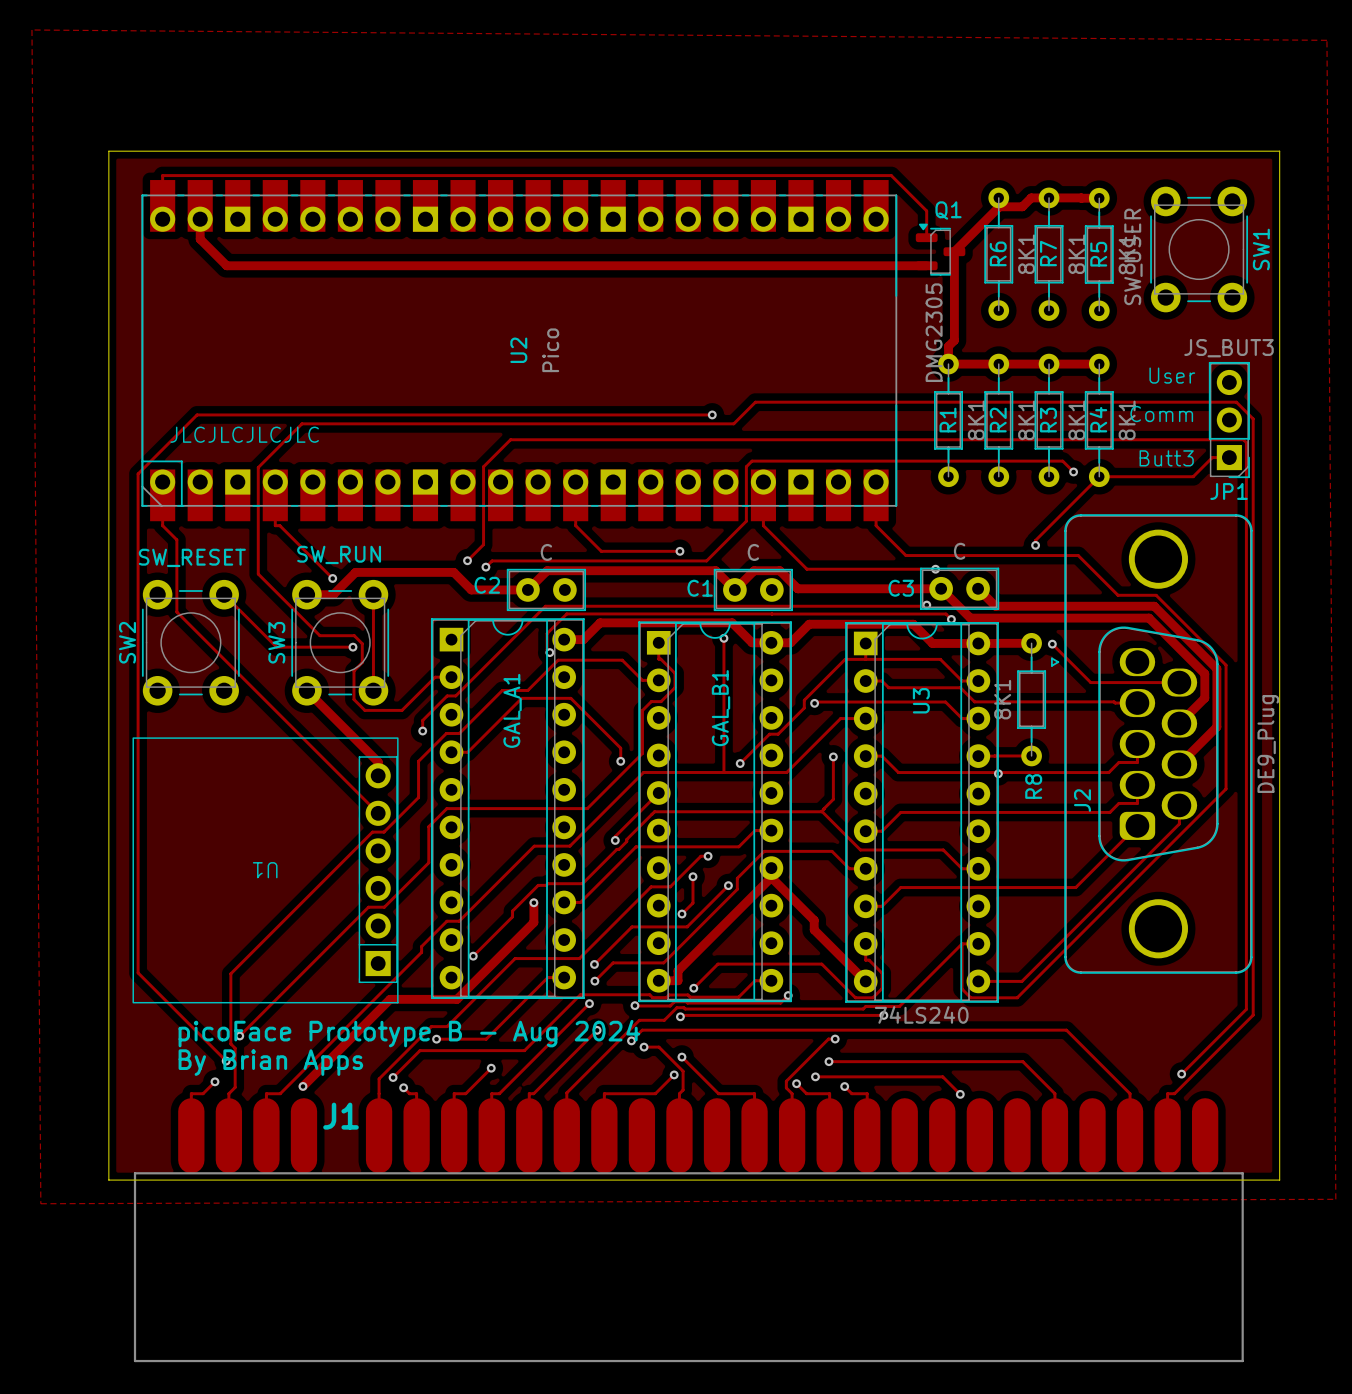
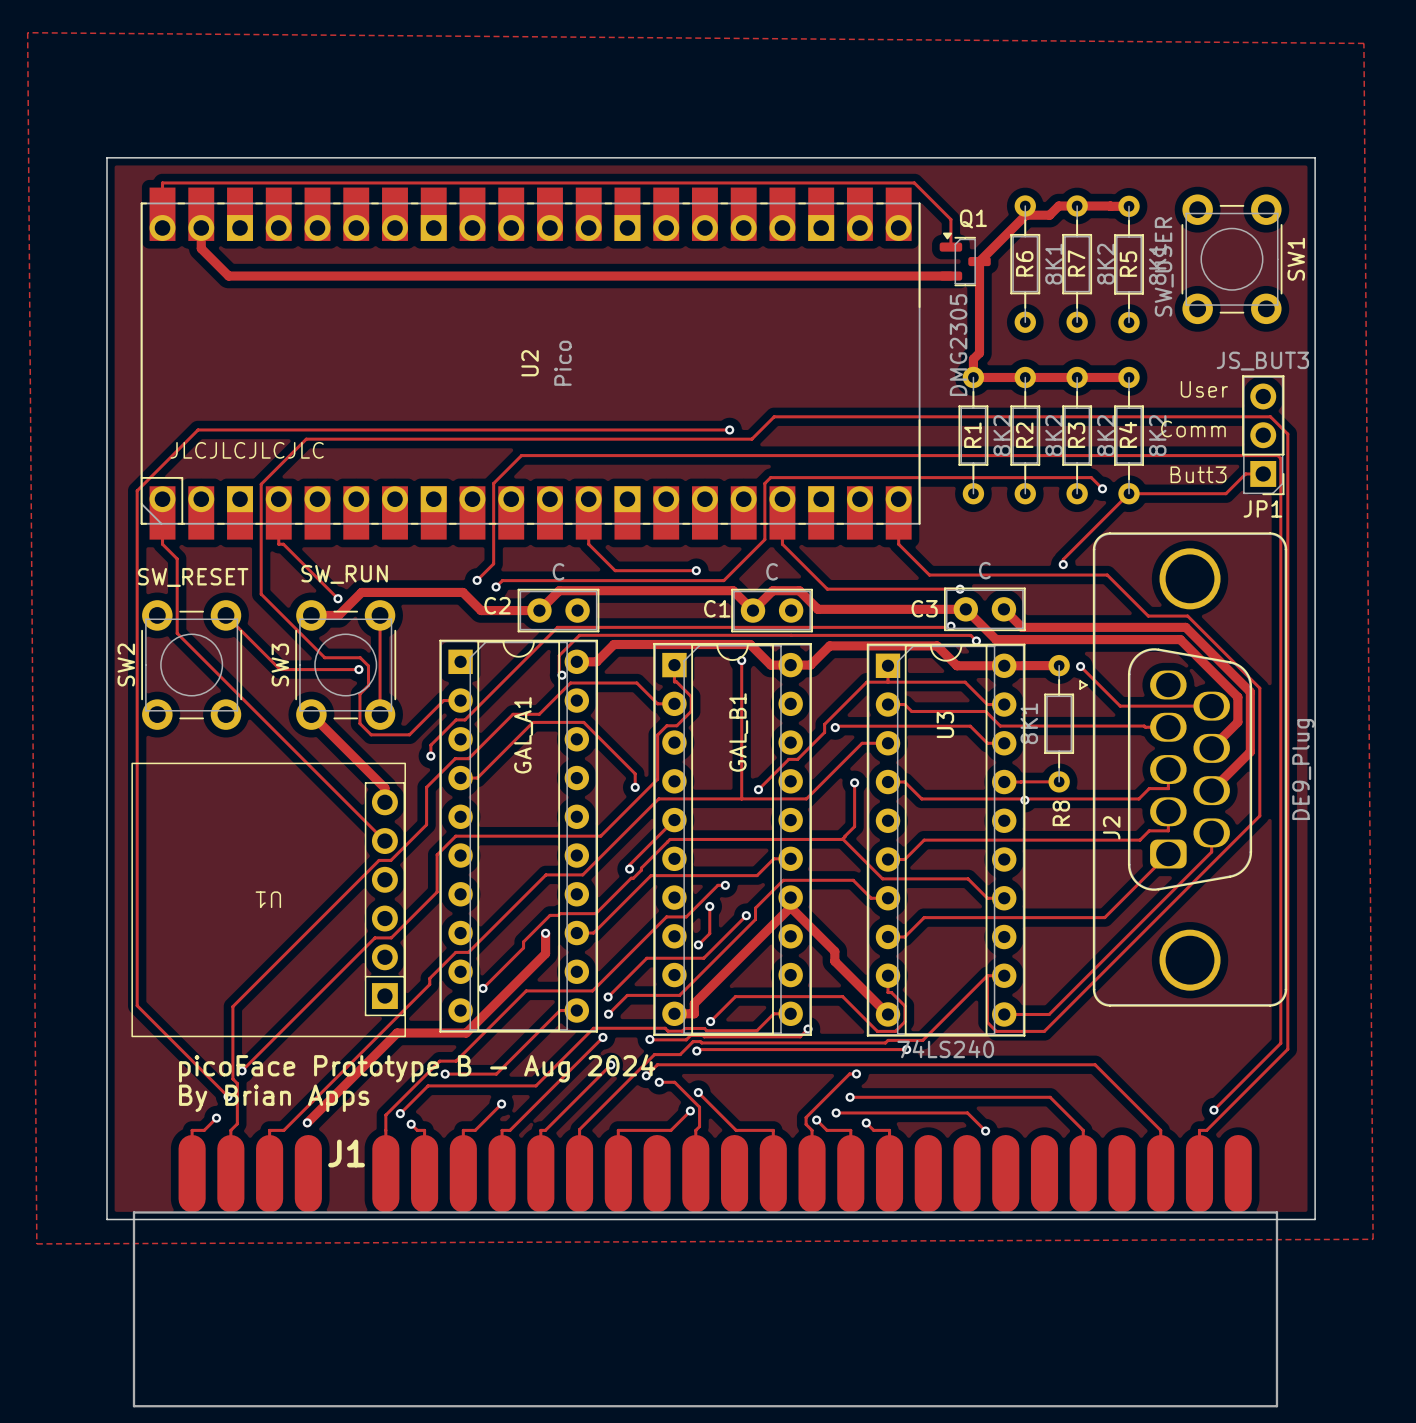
R7 value: 8K1 (1076, 254) -> 8K2 (1105, 264)
R1 value: 8K1 (976, 420) -> 8K2 (1002, 435)
R2 value: 8K1 (1026, 420) -> 8K2 (1054, 435)
R3 value: 8K1 (1076, 420) -> 8K2 (1105, 435)
R4 value: 8K1 (1127, 420) -> 8K2 (1157, 435)

